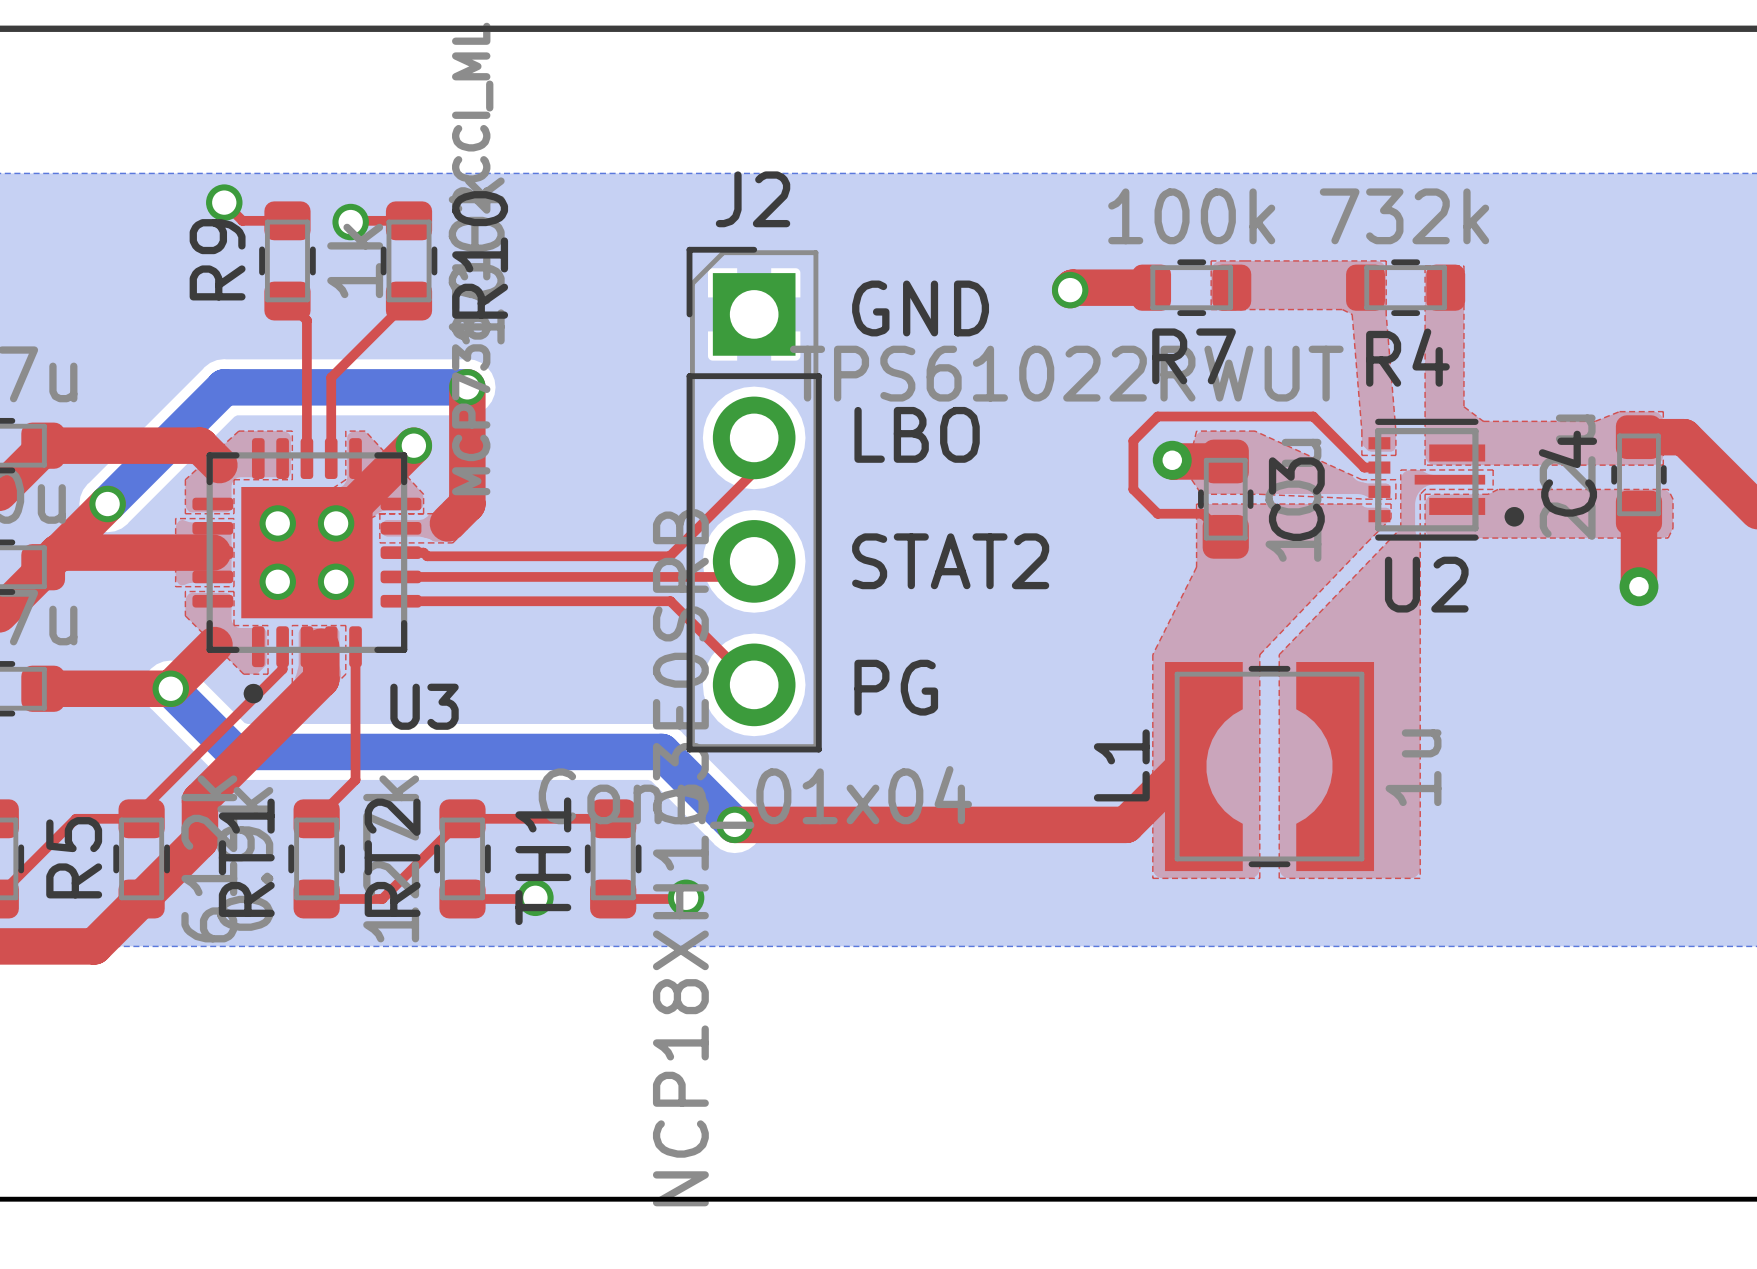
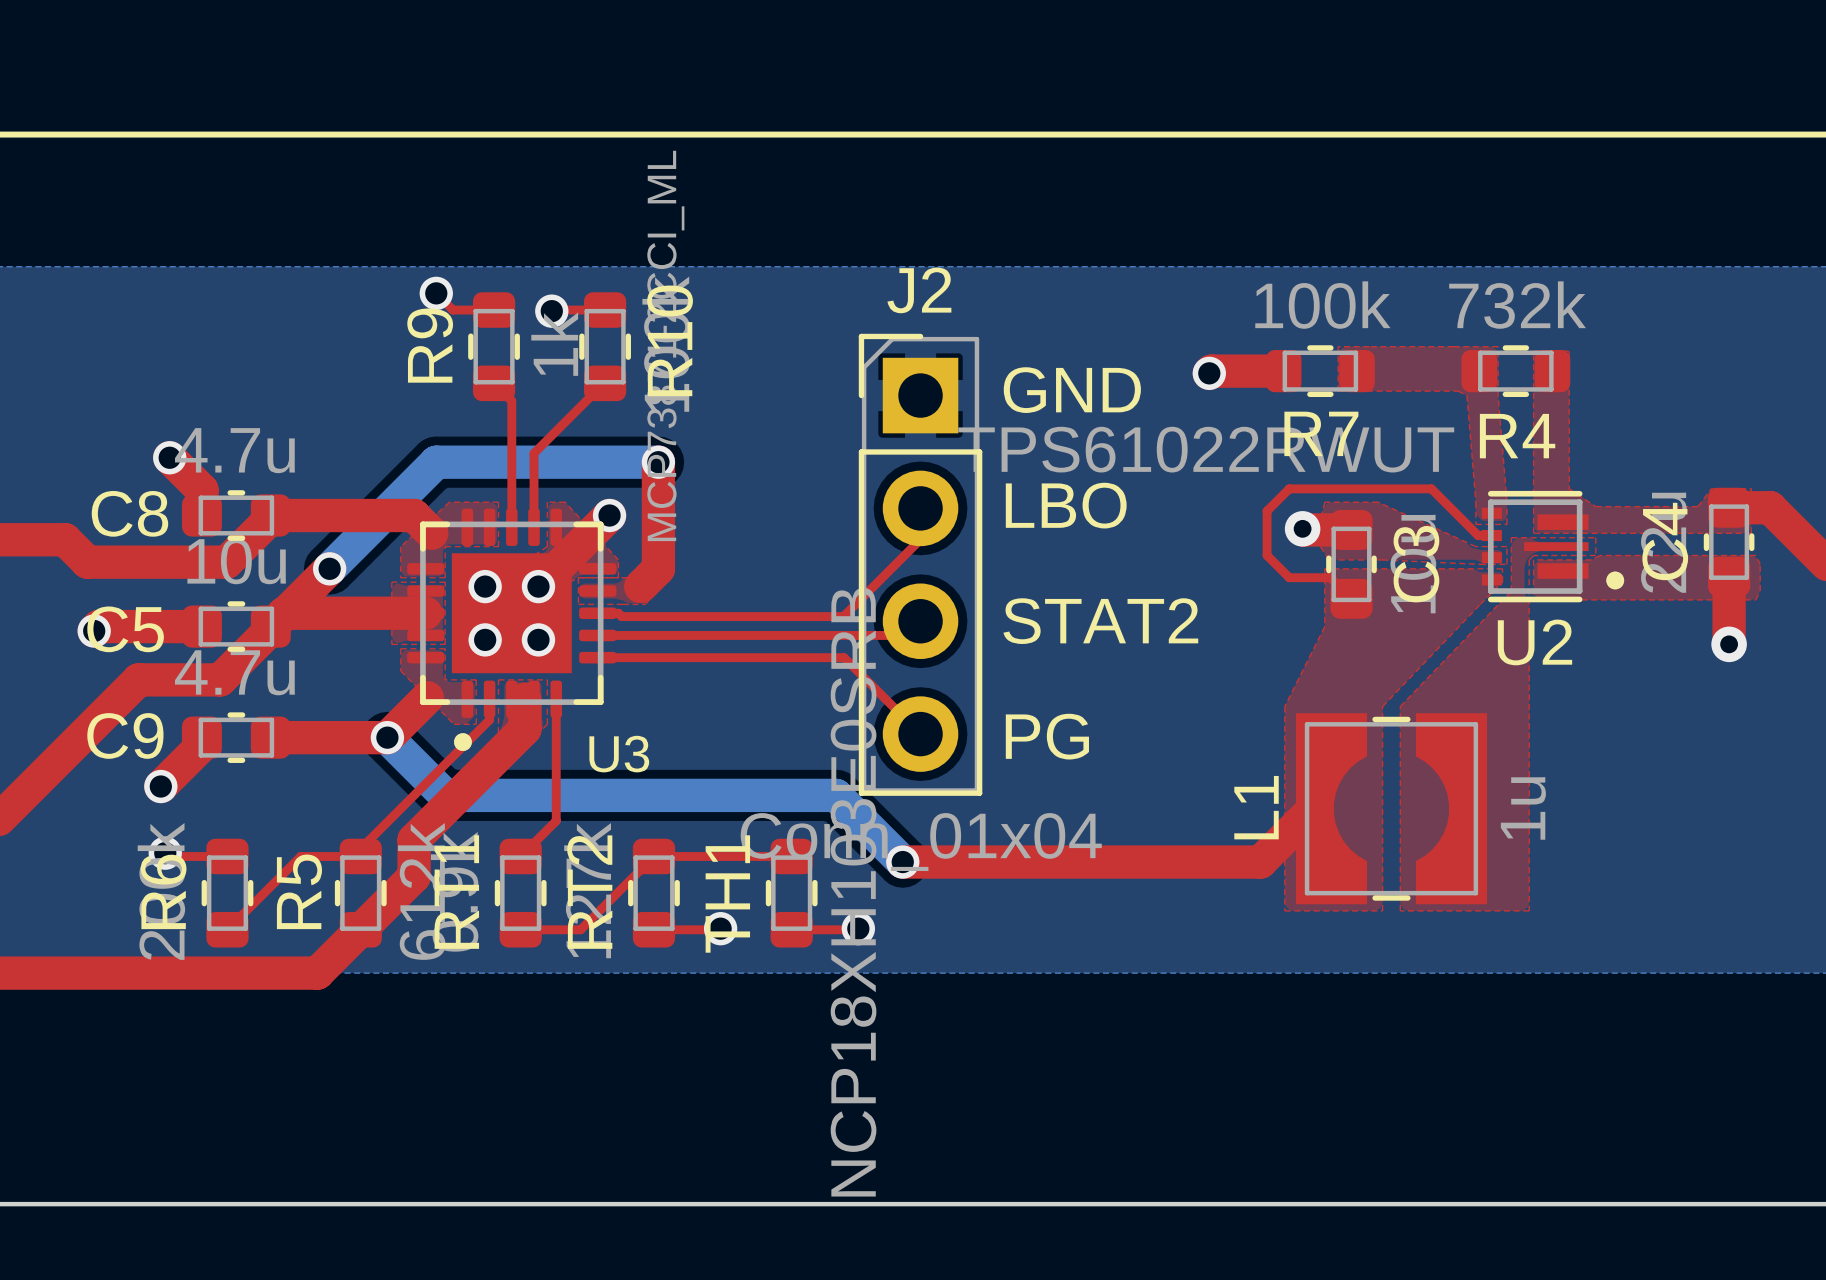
top zone outline: (1463, 406) (1483, 421) (1595, 421) (1619, 411) (1663, 411) (1663, 416) -> (1569, 479) (1569, 488) (1595, 506) (1698, 506) (1711, 488) (1751, 488)

